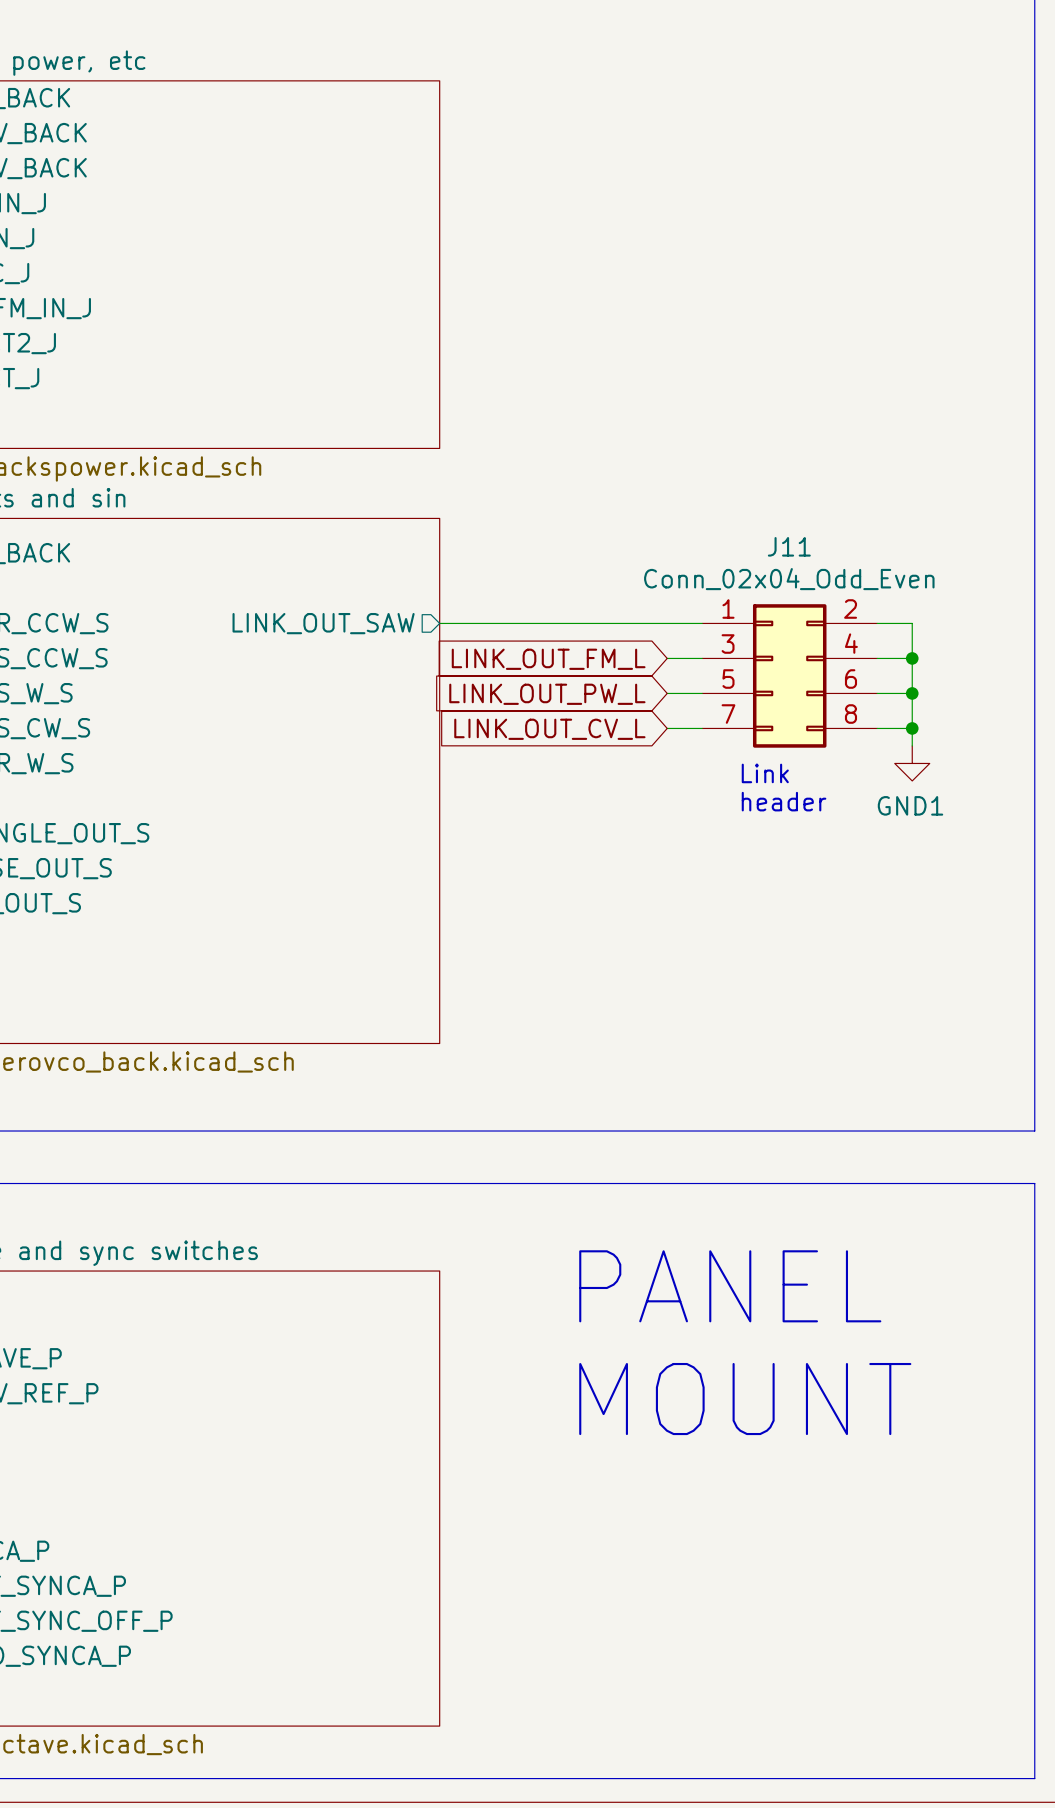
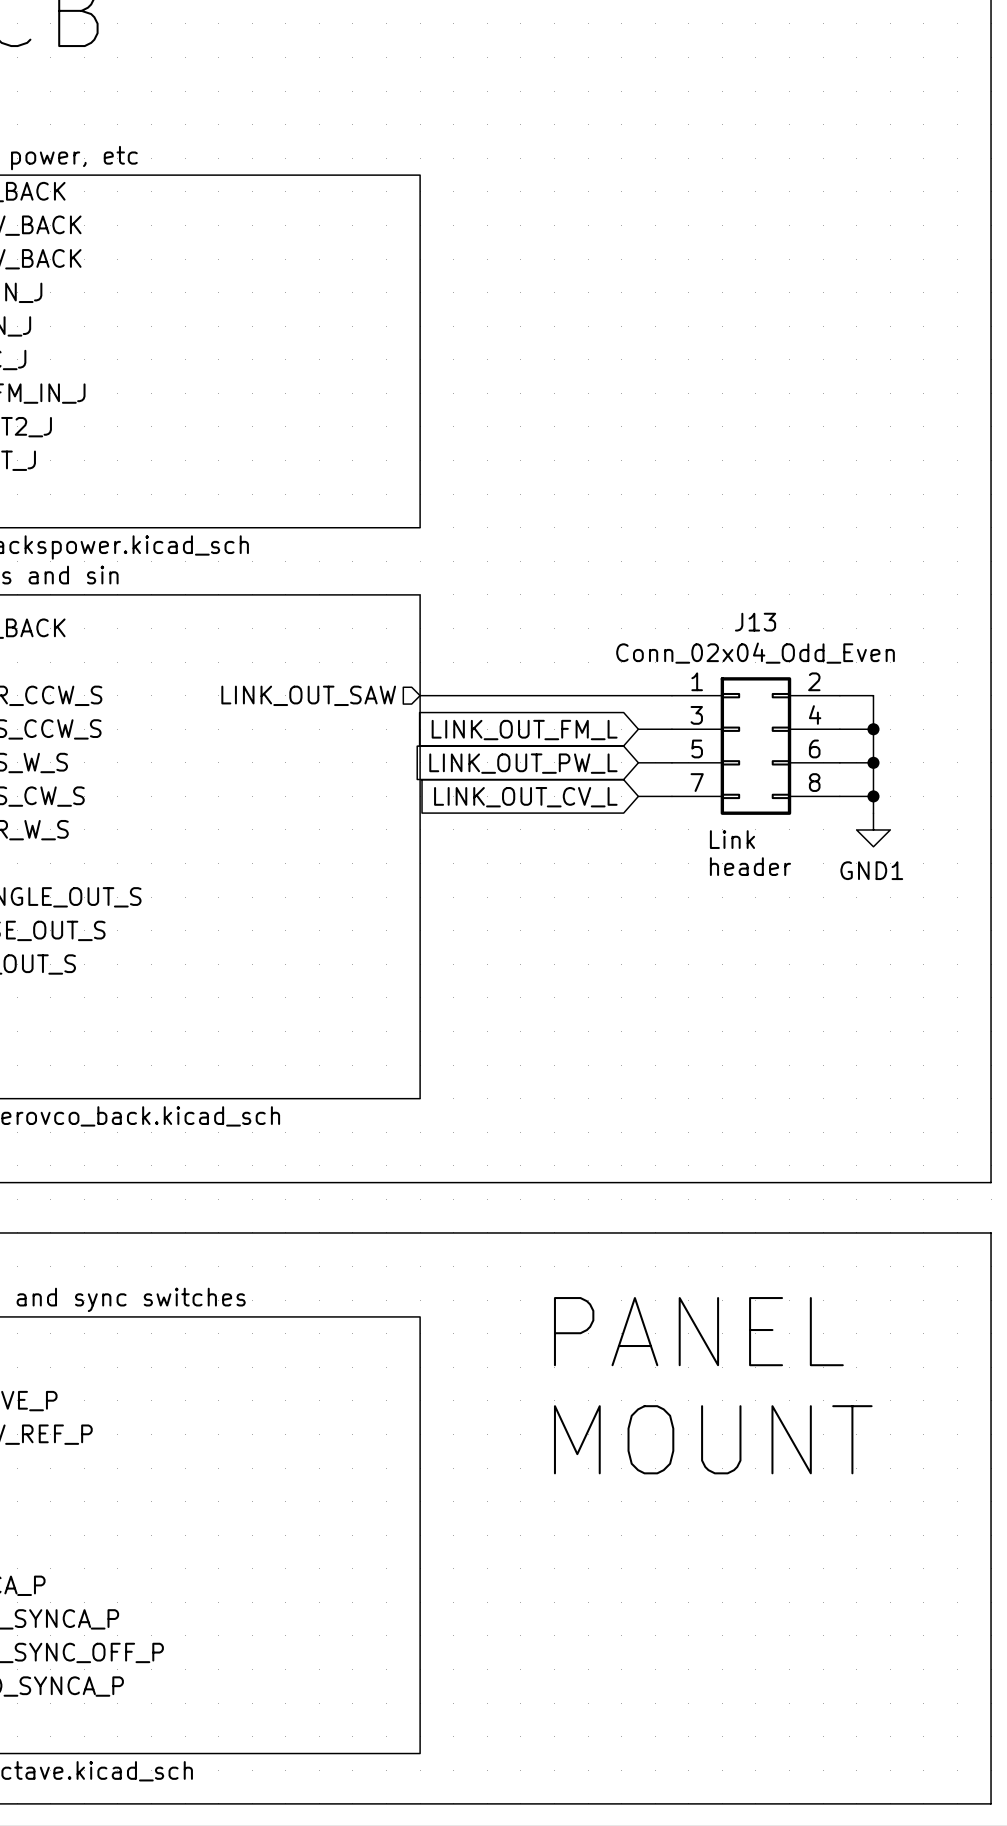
J11 name: J11 (789, 546) -> J13 (755, 622)

